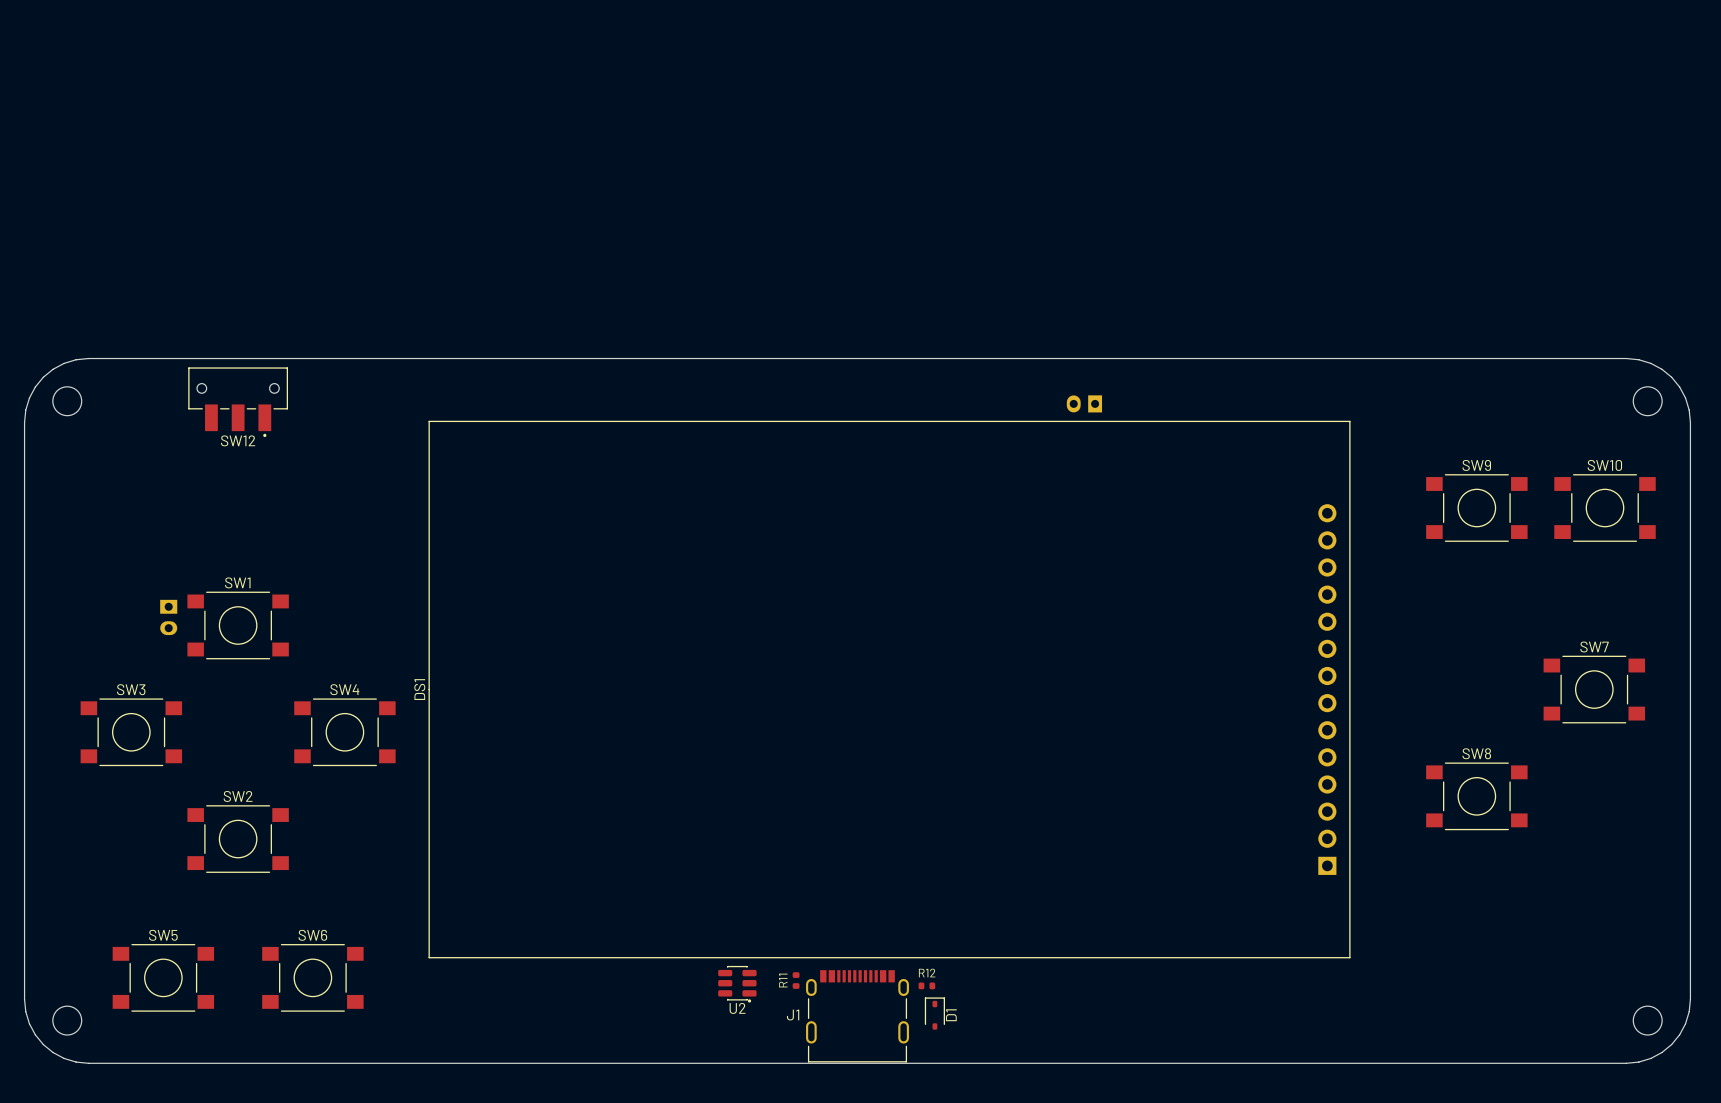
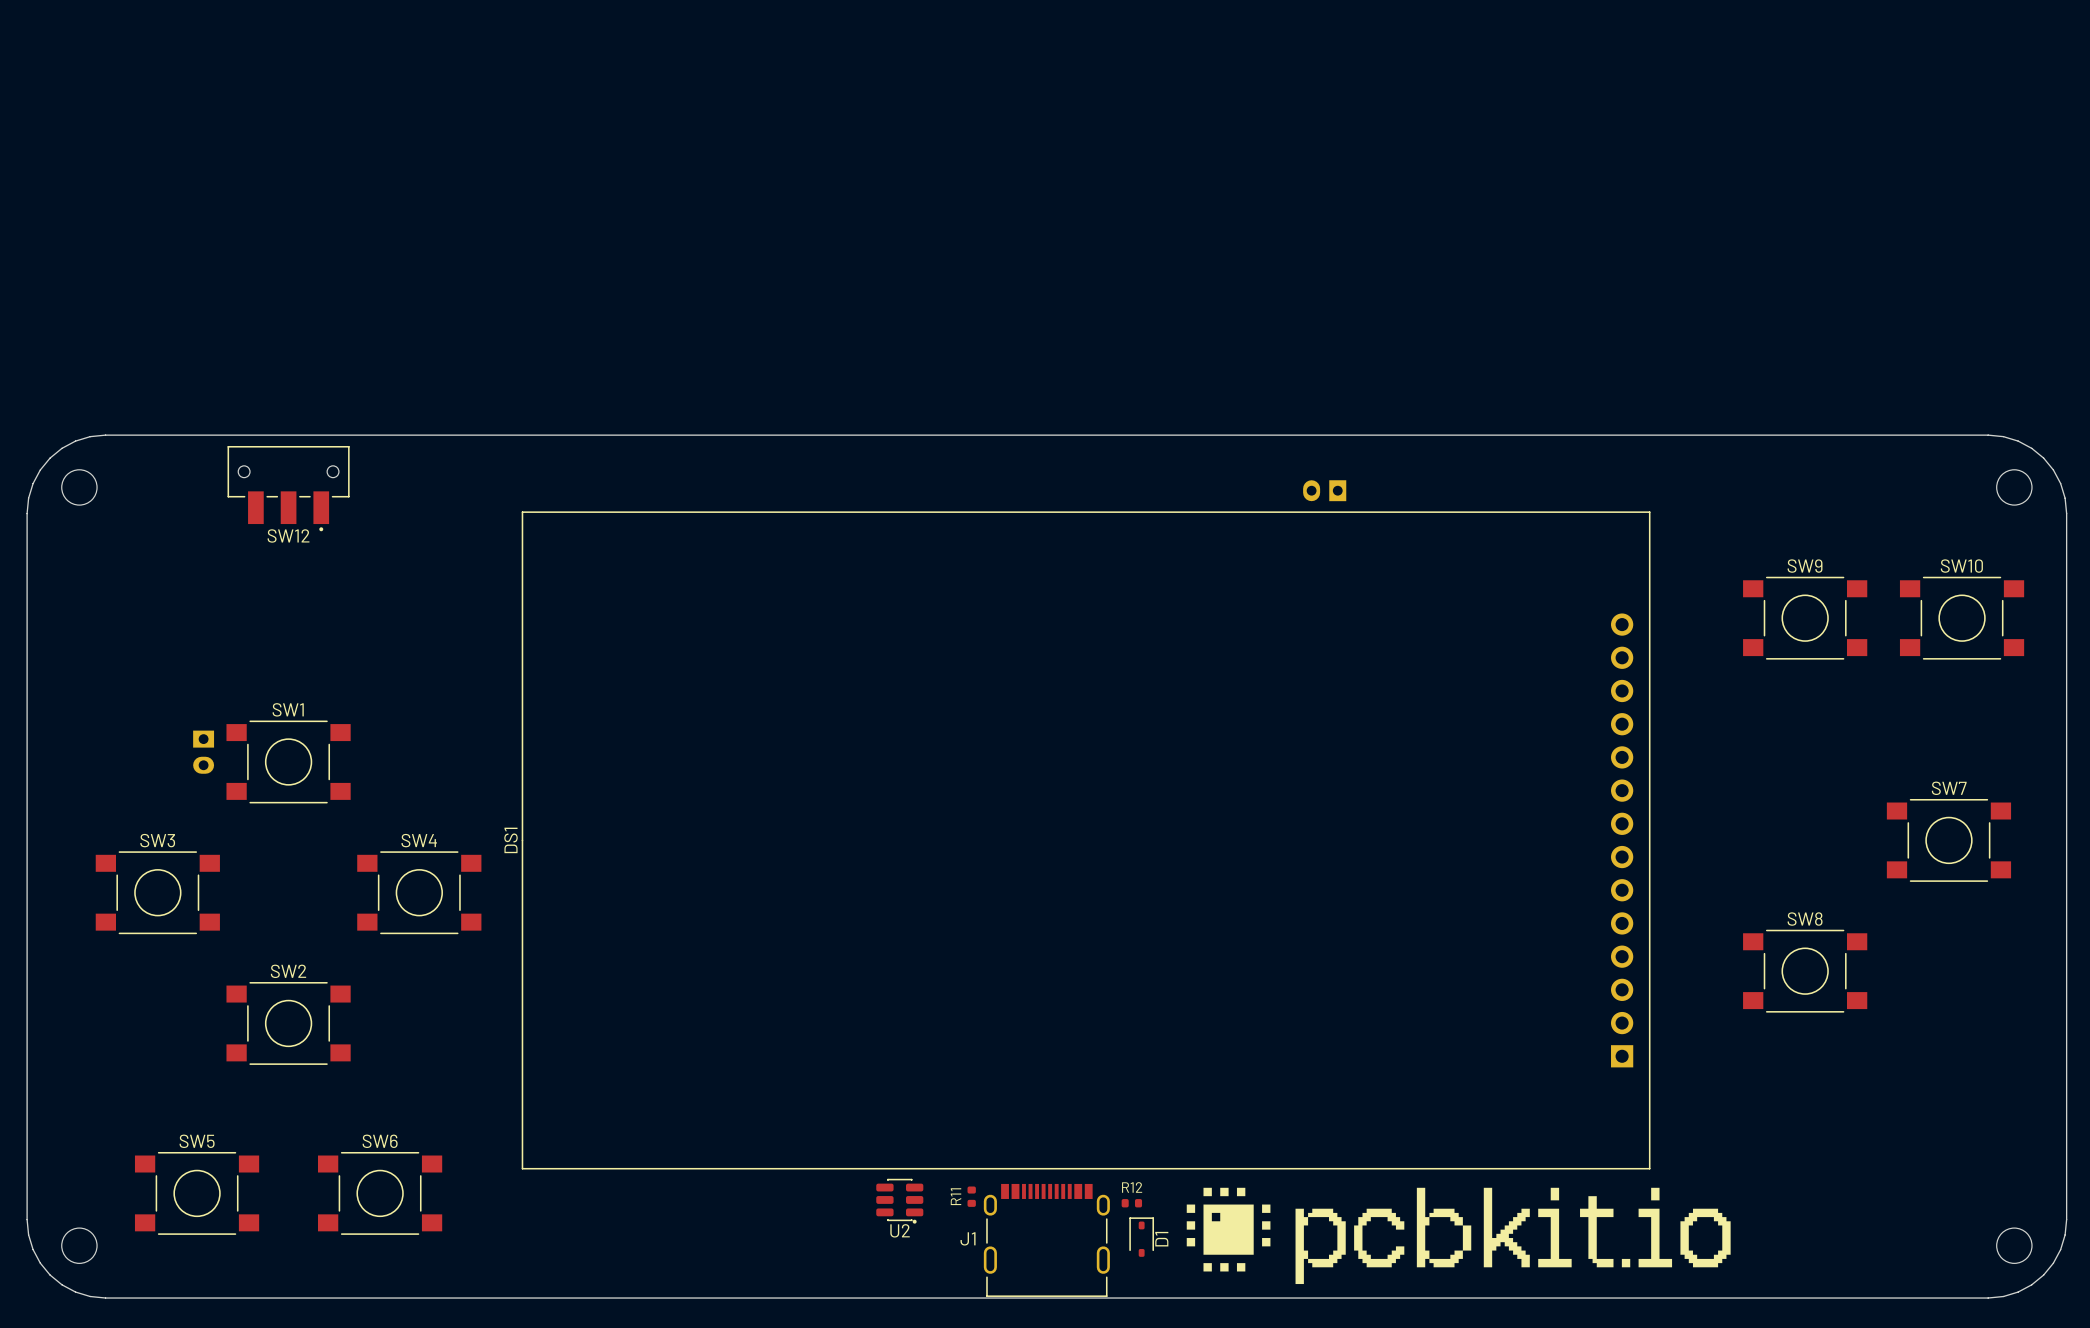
drawing: none -> [1186, 1187, 1731, 1285]

